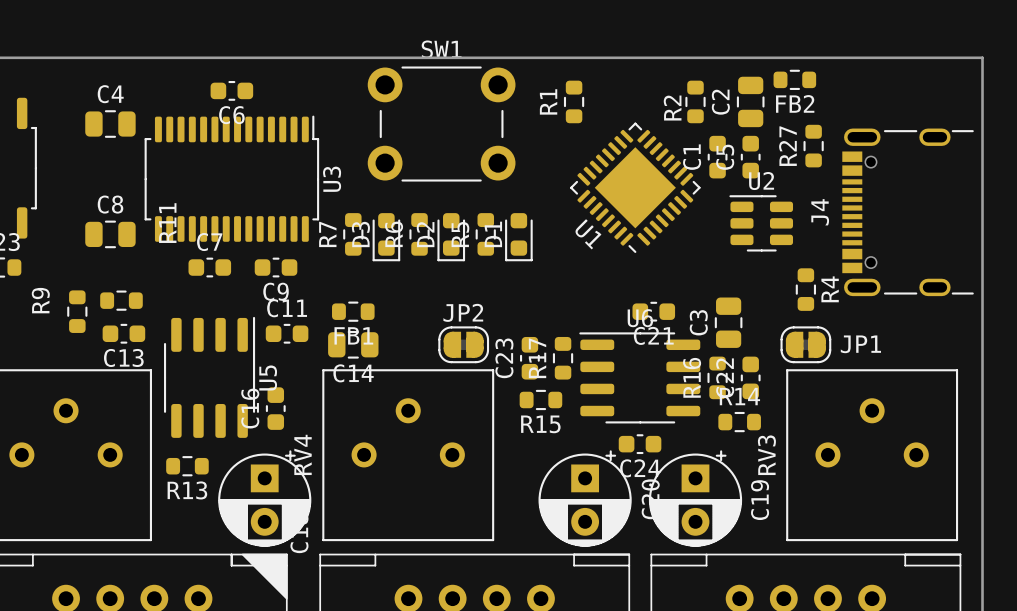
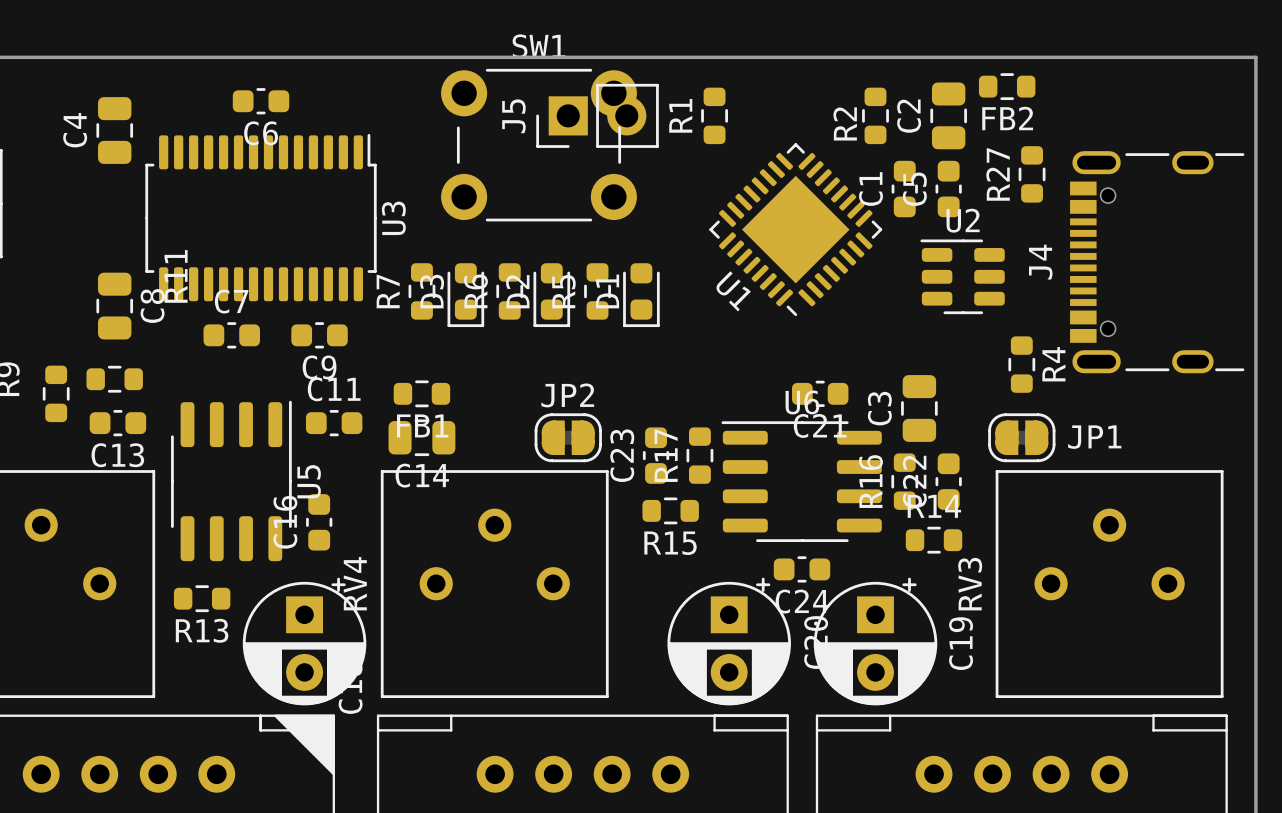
C4 name position: C4 (110, 94) -> C4 (75, 130)
J5: none -> (597, 115)
C4 rotation: 0° (110, 124) -> 90° clockwise (114, 130)
C8 rotation: 0° (110, 234) -> 90° clockwise (114, 306)

